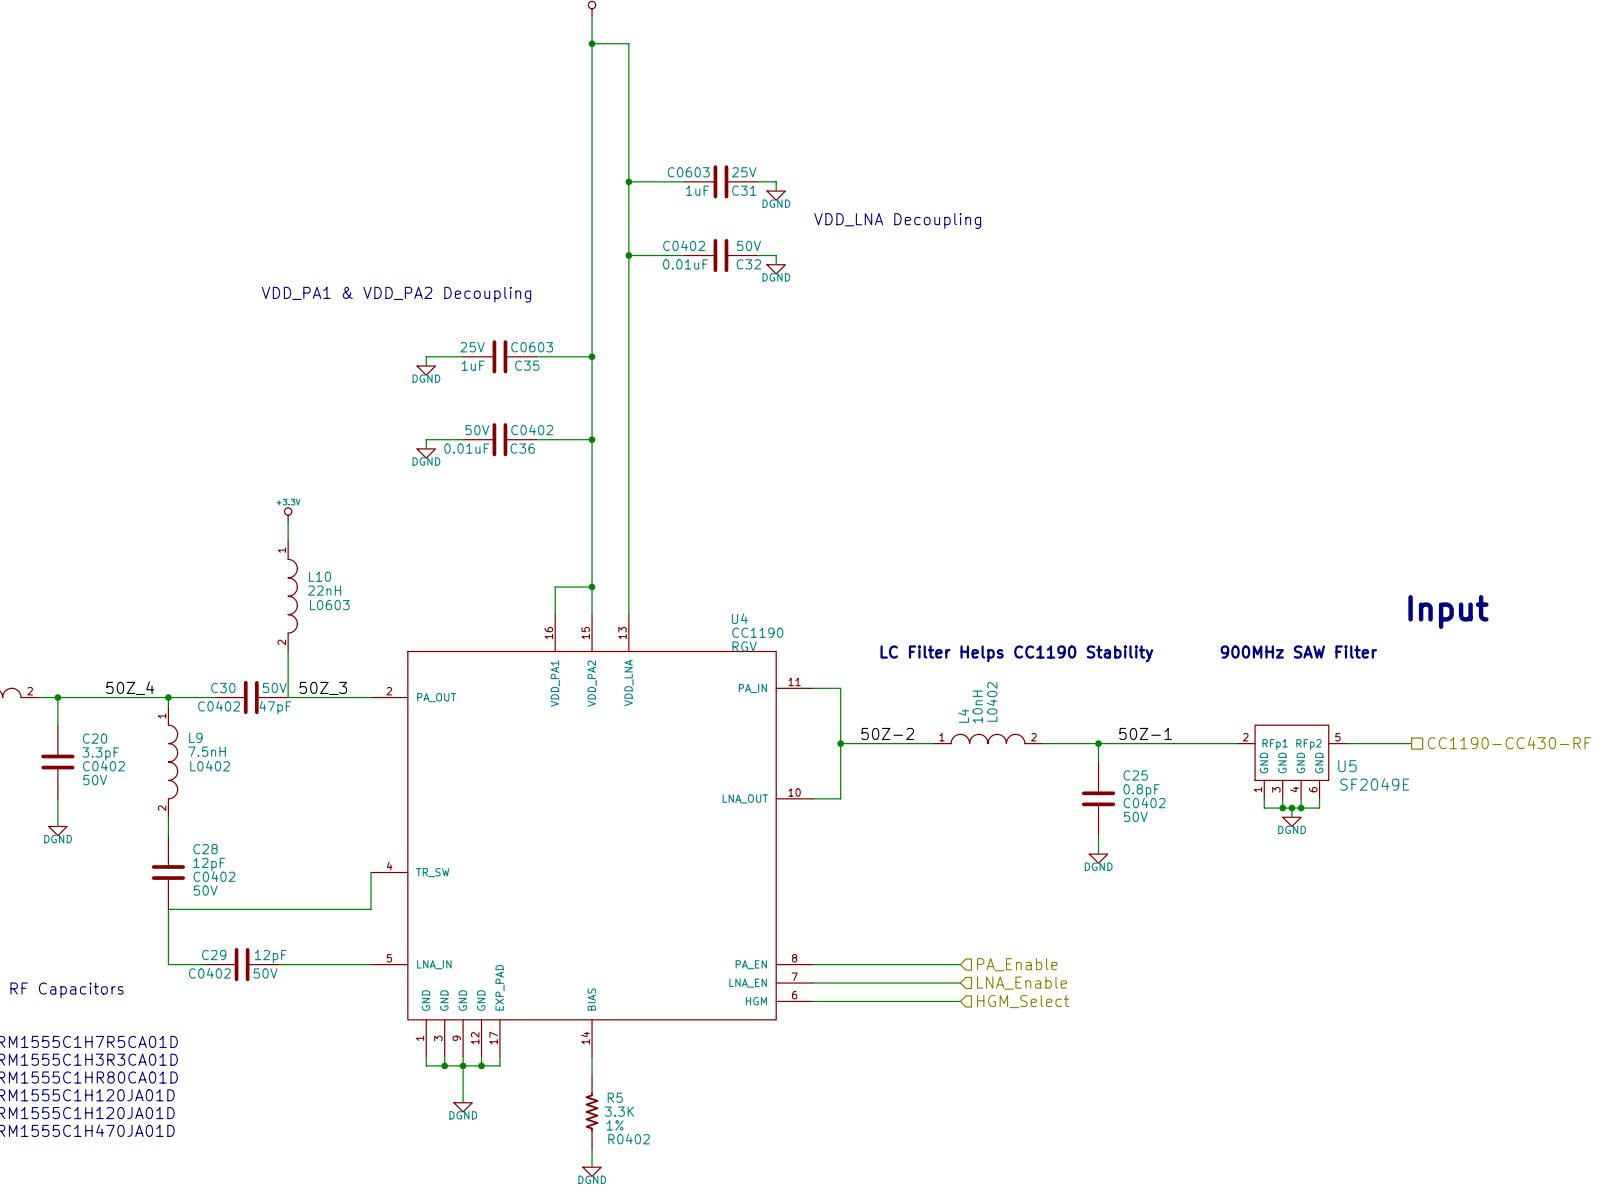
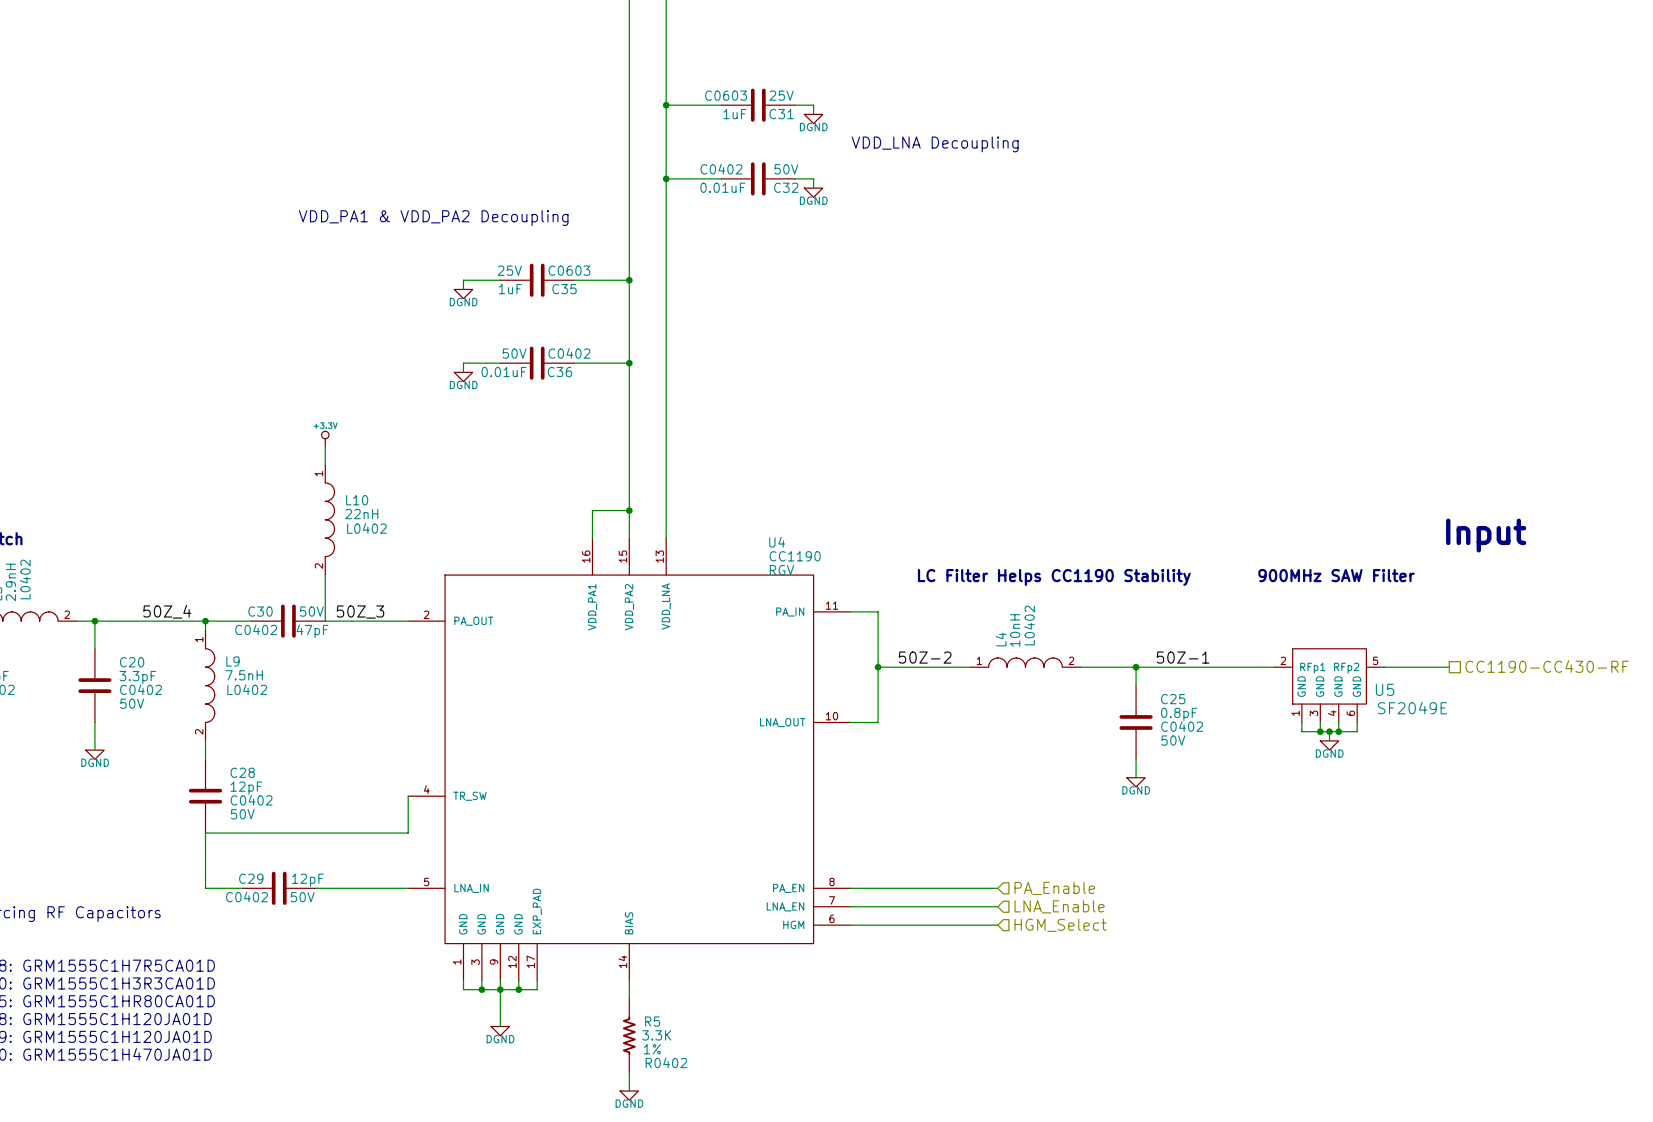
L10 text: L0603 (329, 605) -> L0402 (366, 528)

